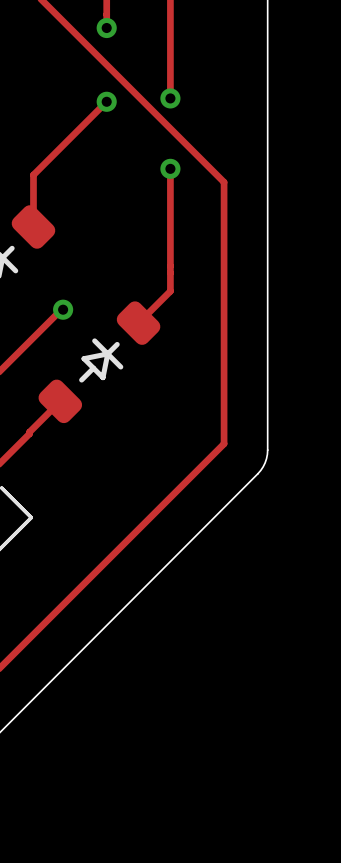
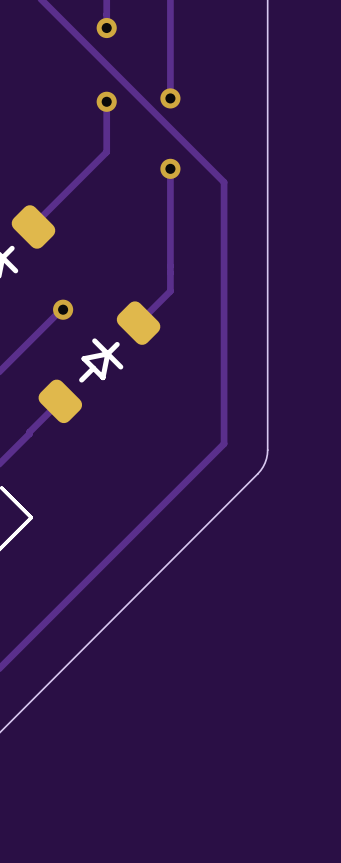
track: (106, 101) (33, 175) (33, 225) -> (106, 101) (106, 152) (33, 225)

